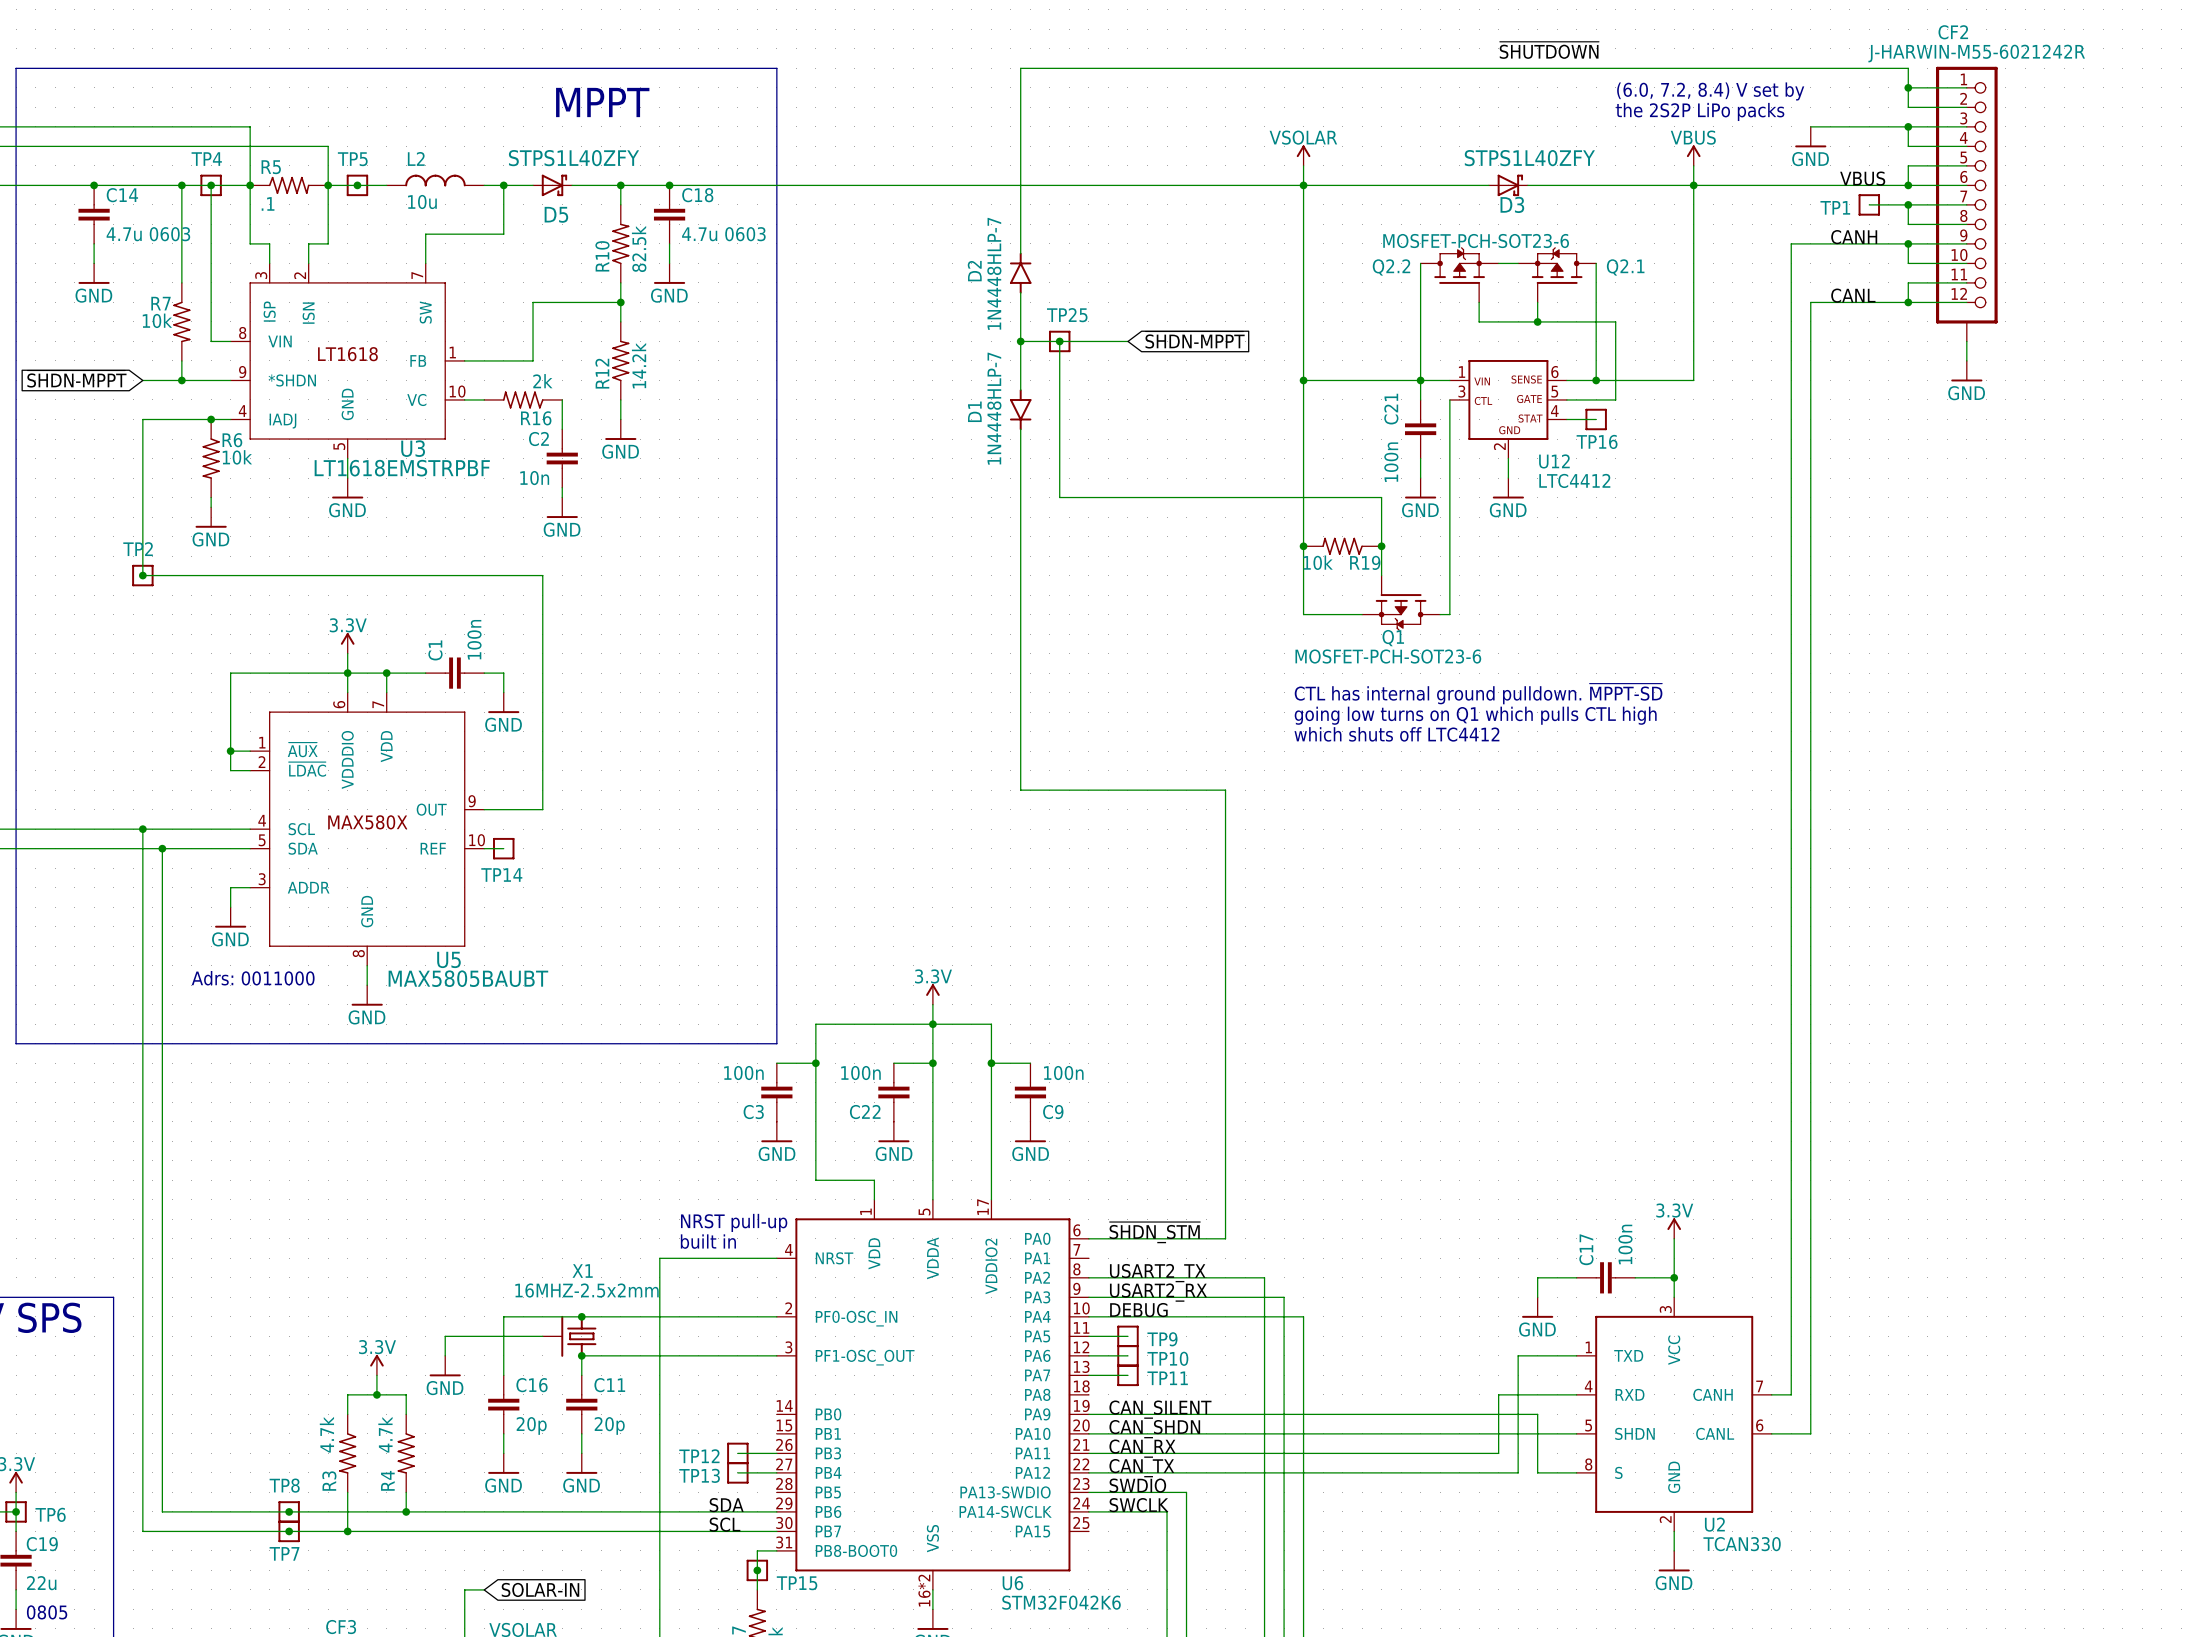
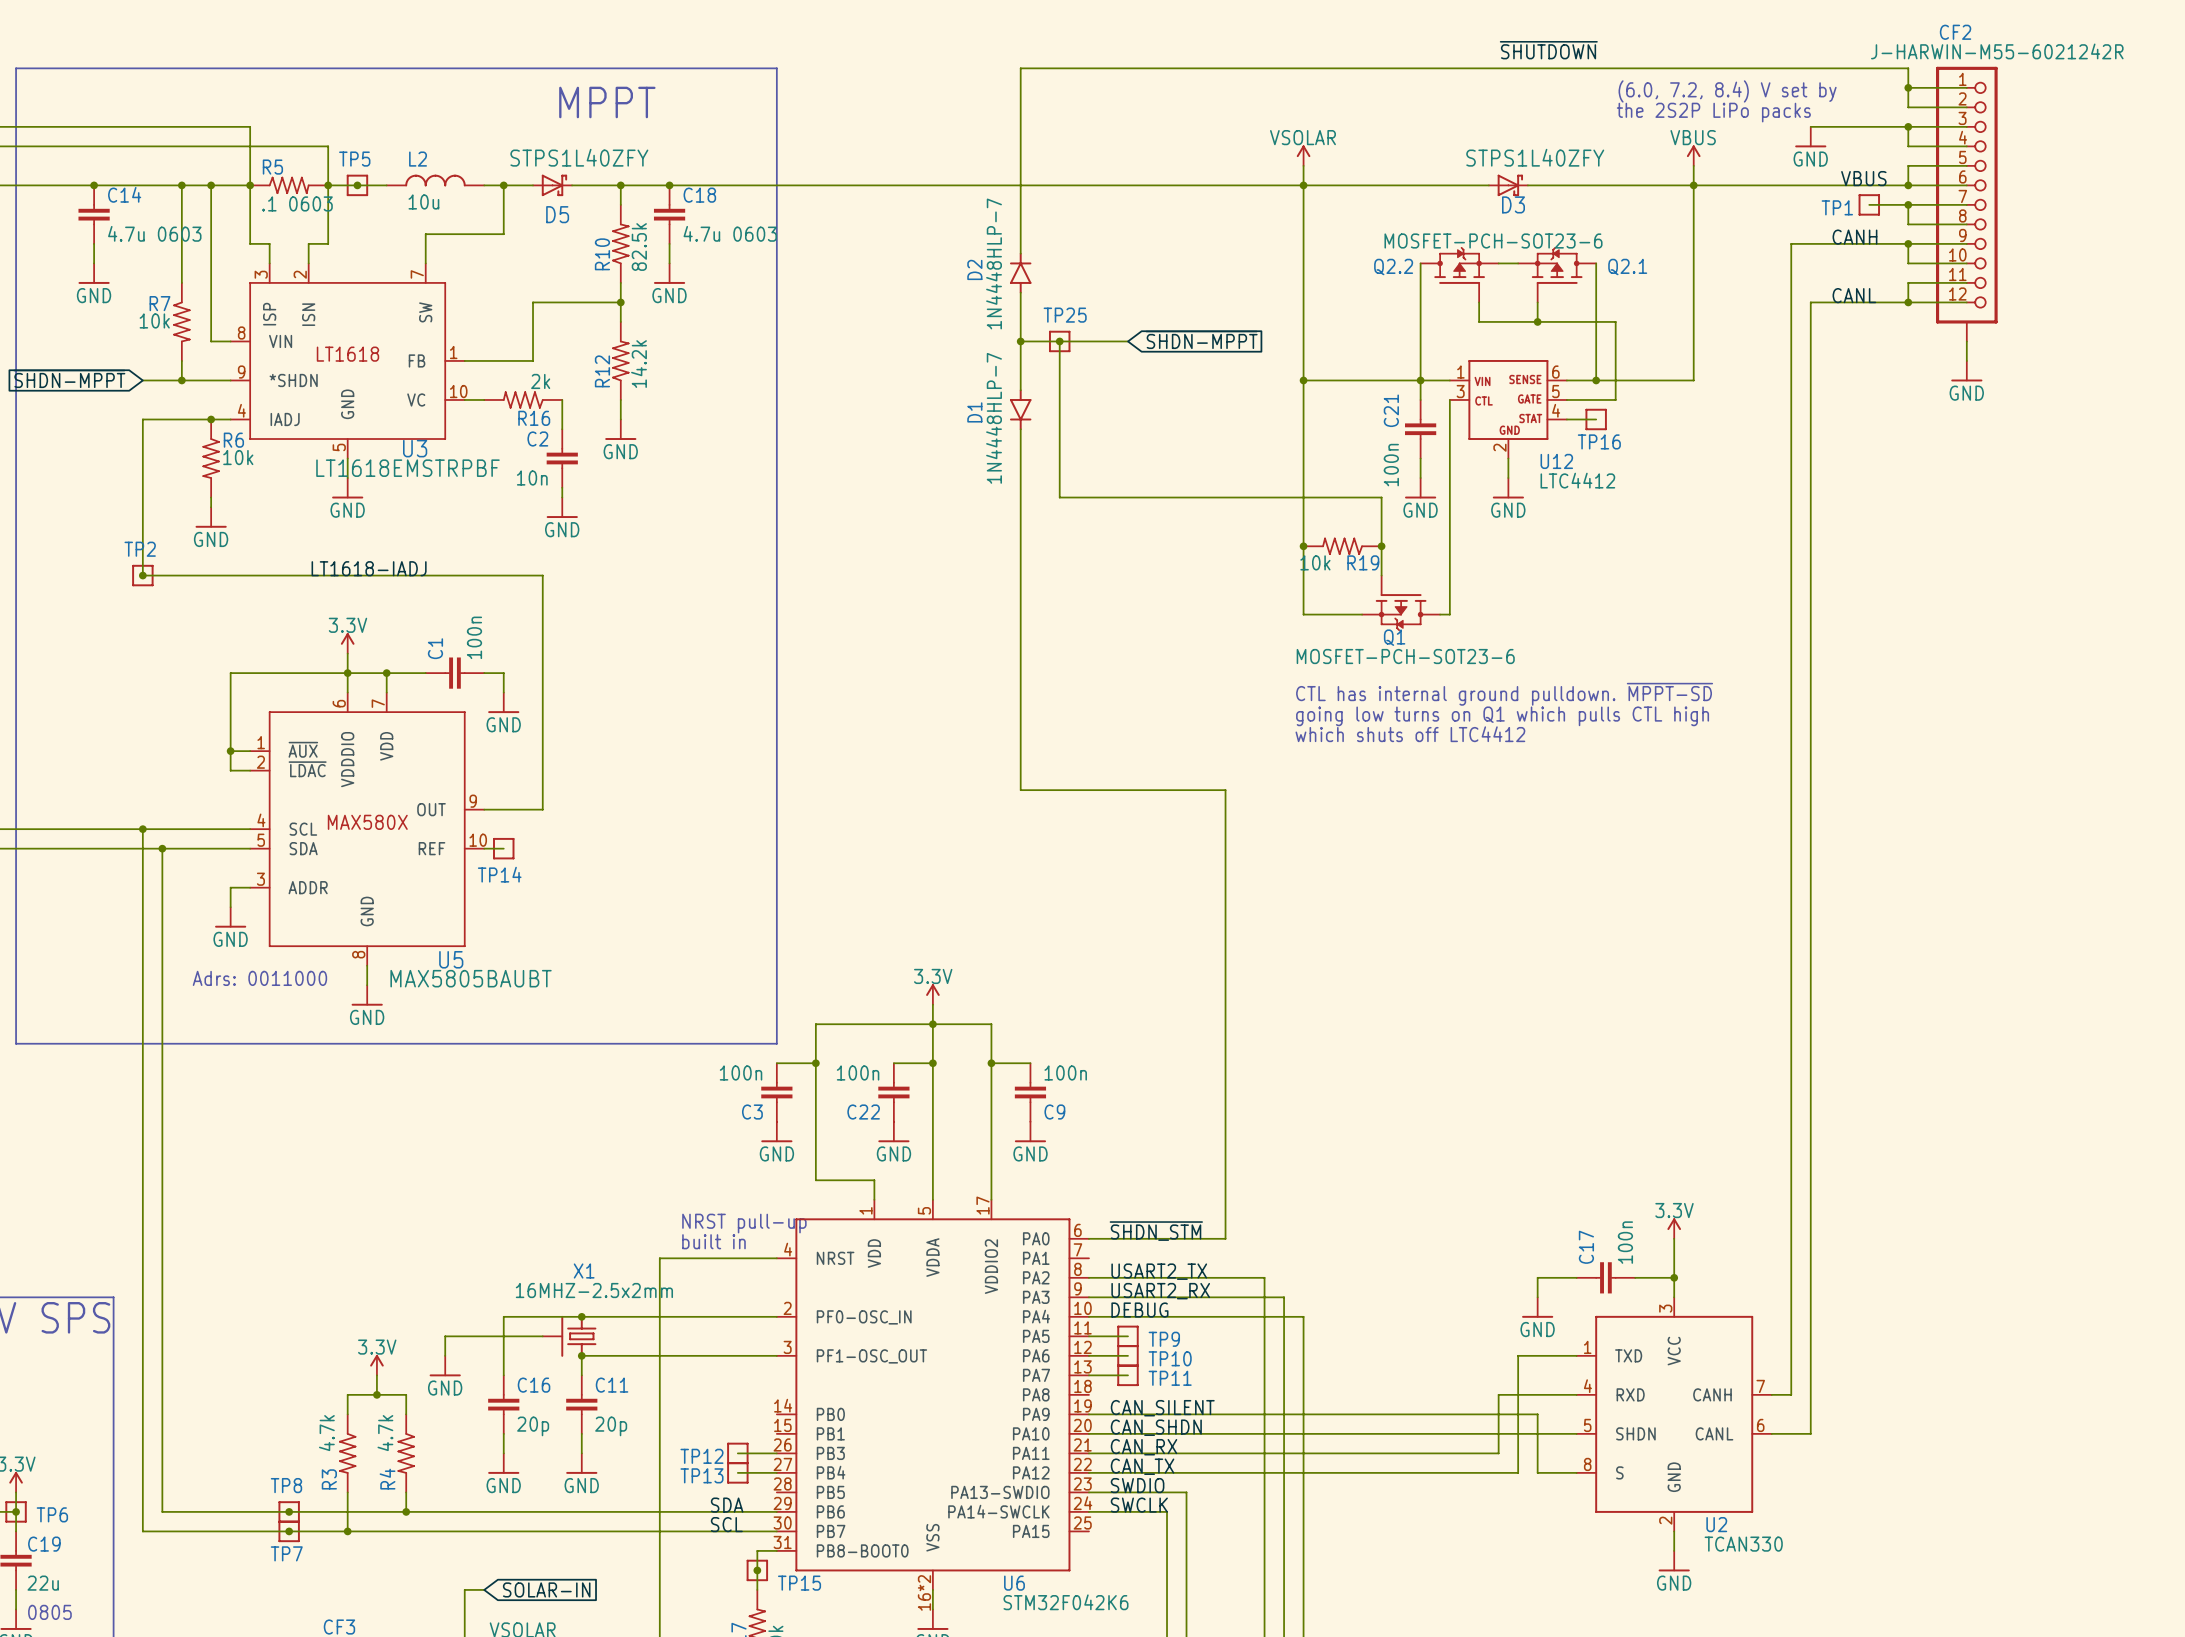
TP4: (211, 185) -> none
R5 value: .1 (268, 203) -> .1 0603 (297, 203)
label: none -> LT1618-IADJ (369, 568)

